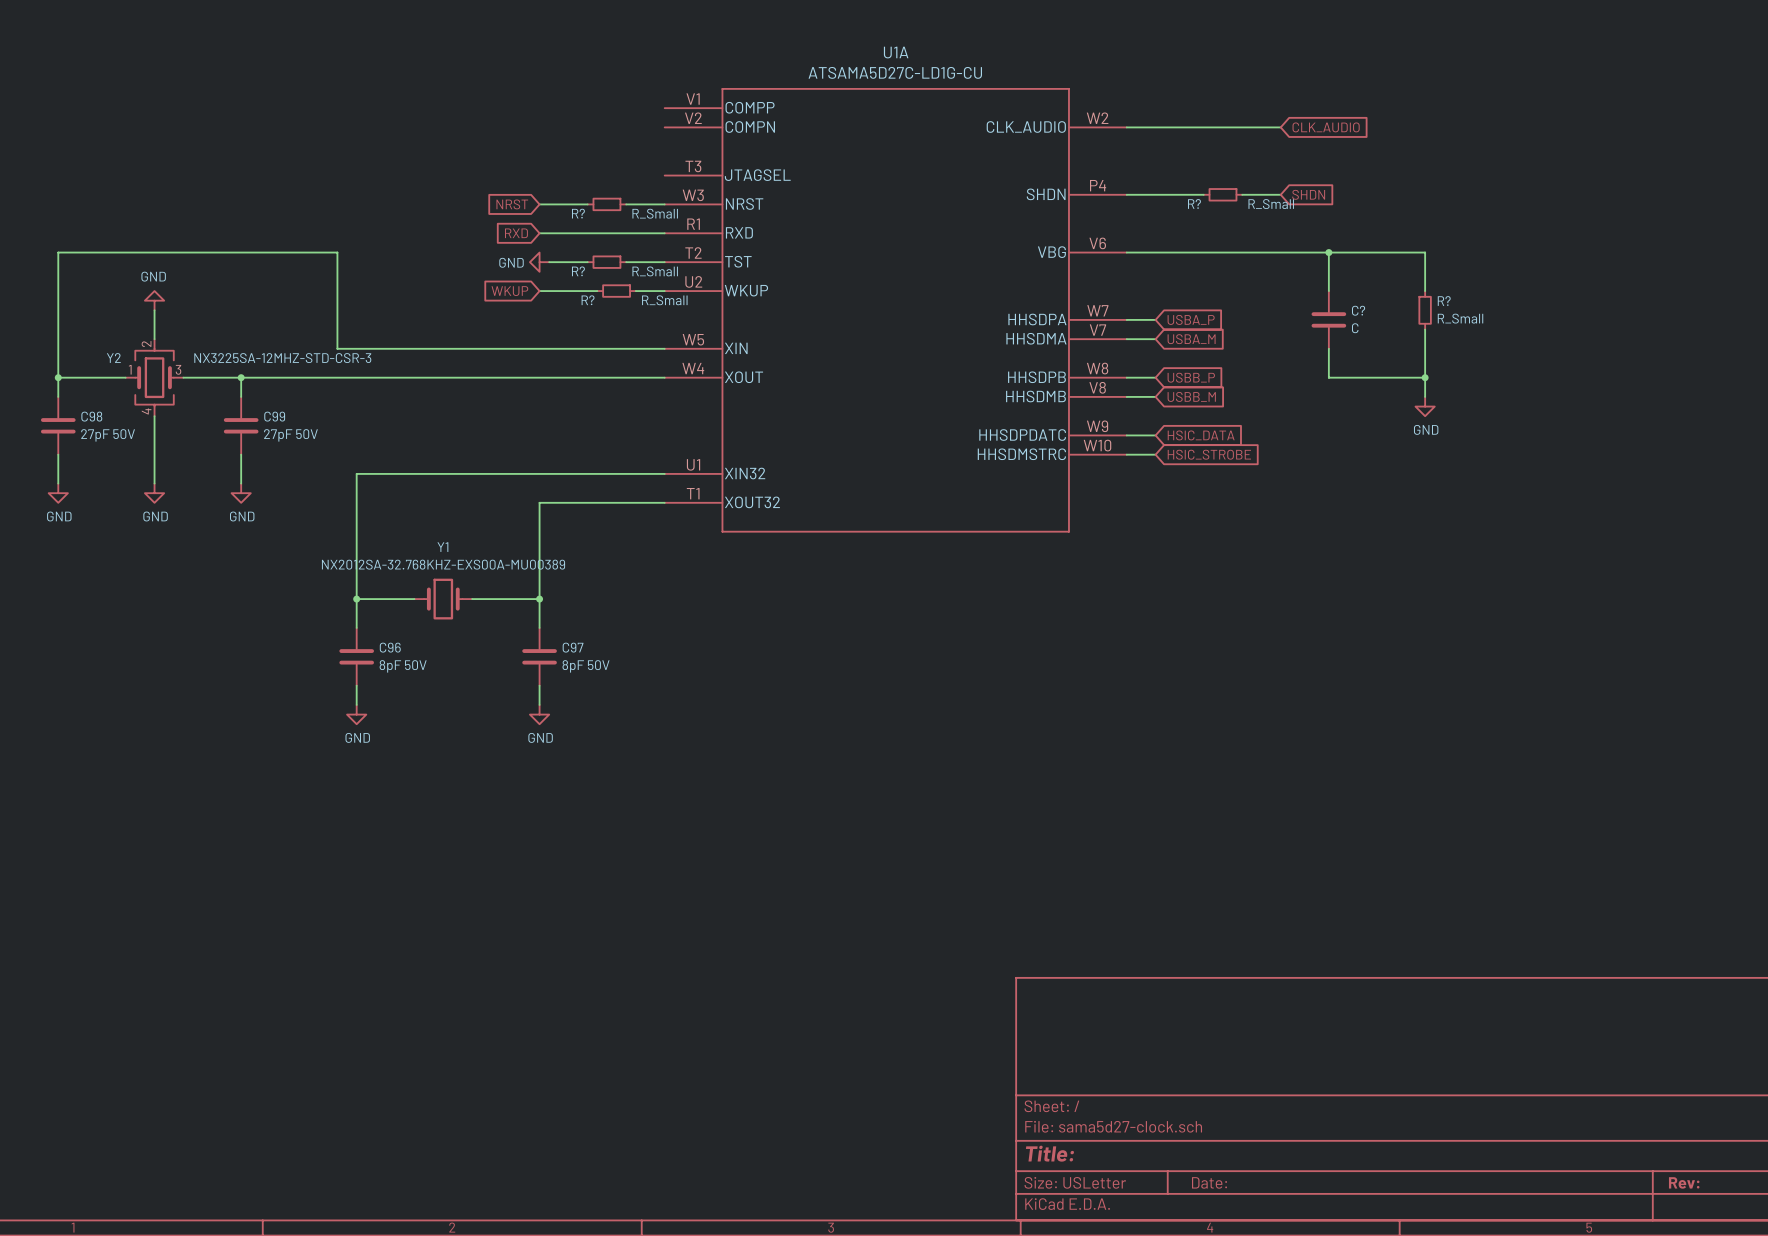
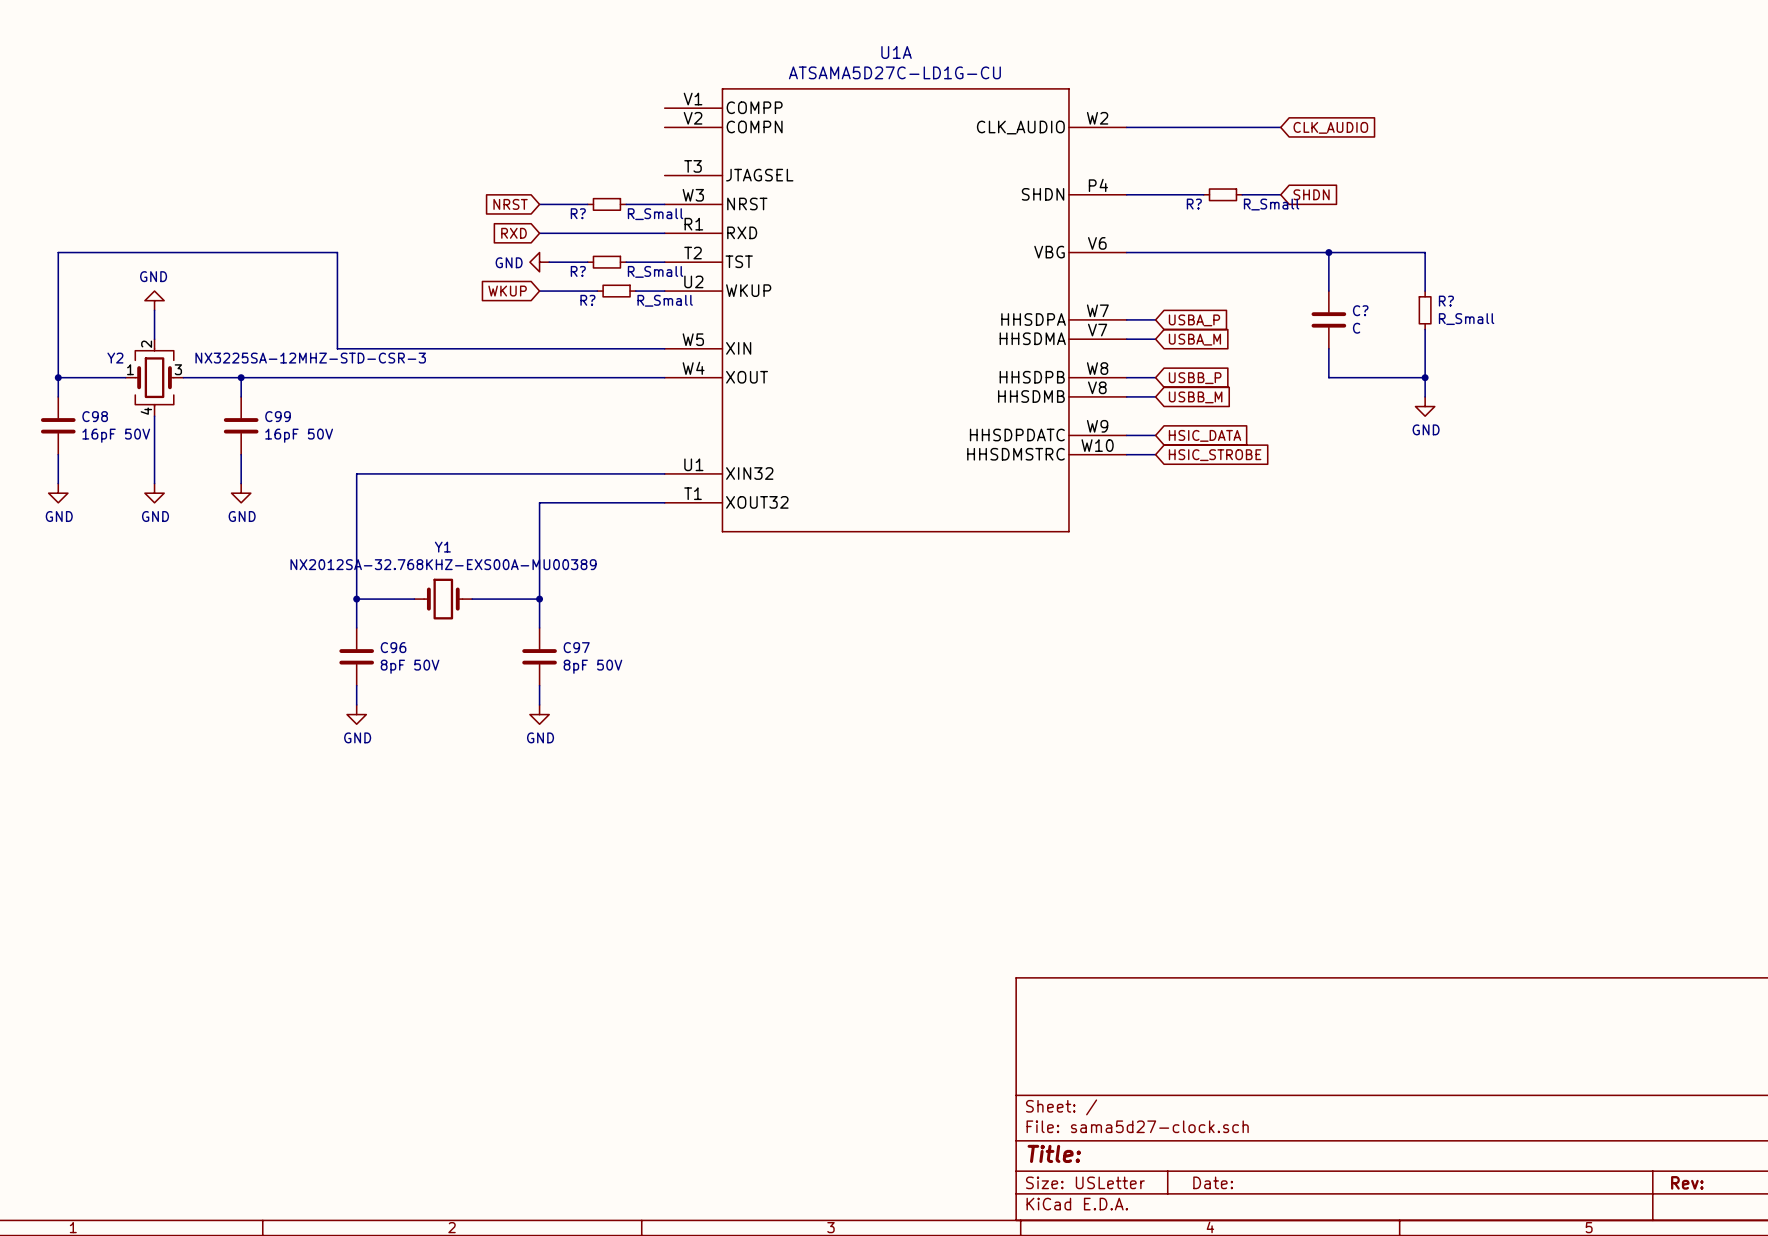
C98 value: 27pF 50V (108, 435) -> 16pF 50V (116, 435)
C99 value: 27pF 50V (290, 435) -> 16pF 50V (299, 435)

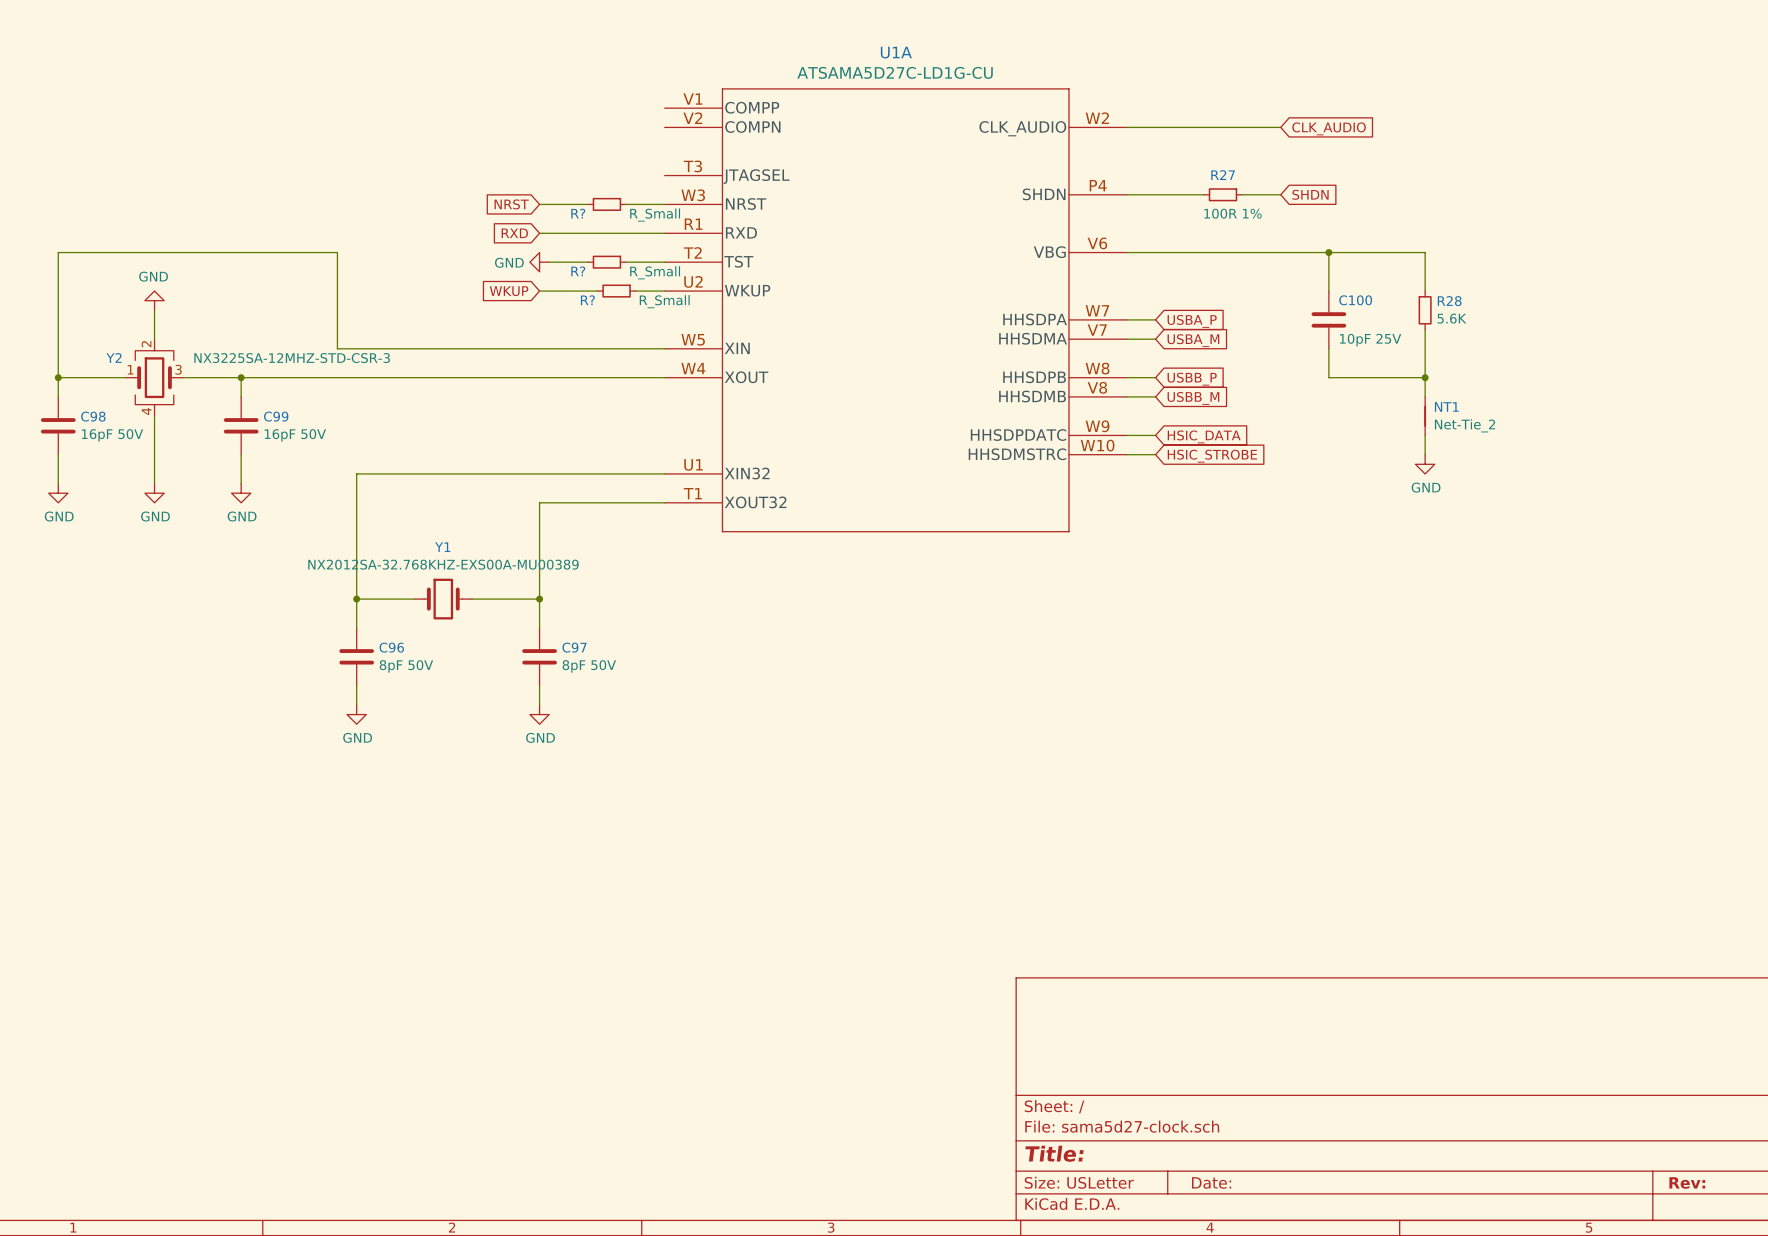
R? name: R? (1194, 204) -> R27 (1223, 175)
R? value: R_Small (1271, 204) -> 100R 1% (1232, 213)
R? name: R? (1446, 301) -> R28 (1449, 301)
C? name: C? (1360, 310) -> C100 (1355, 300)
R? value: R_Small (1466, 319) -> 5.6K (1451, 318)
C? value: C (1356, 328) -> 10pF 25V (1370, 340)
power symbol position: GND (1425, 406) -> GND (1425, 464)
NT1: none -> Net-Tie_2 (1425, 416)
wire: none -> (1425, 435) (1425, 454)

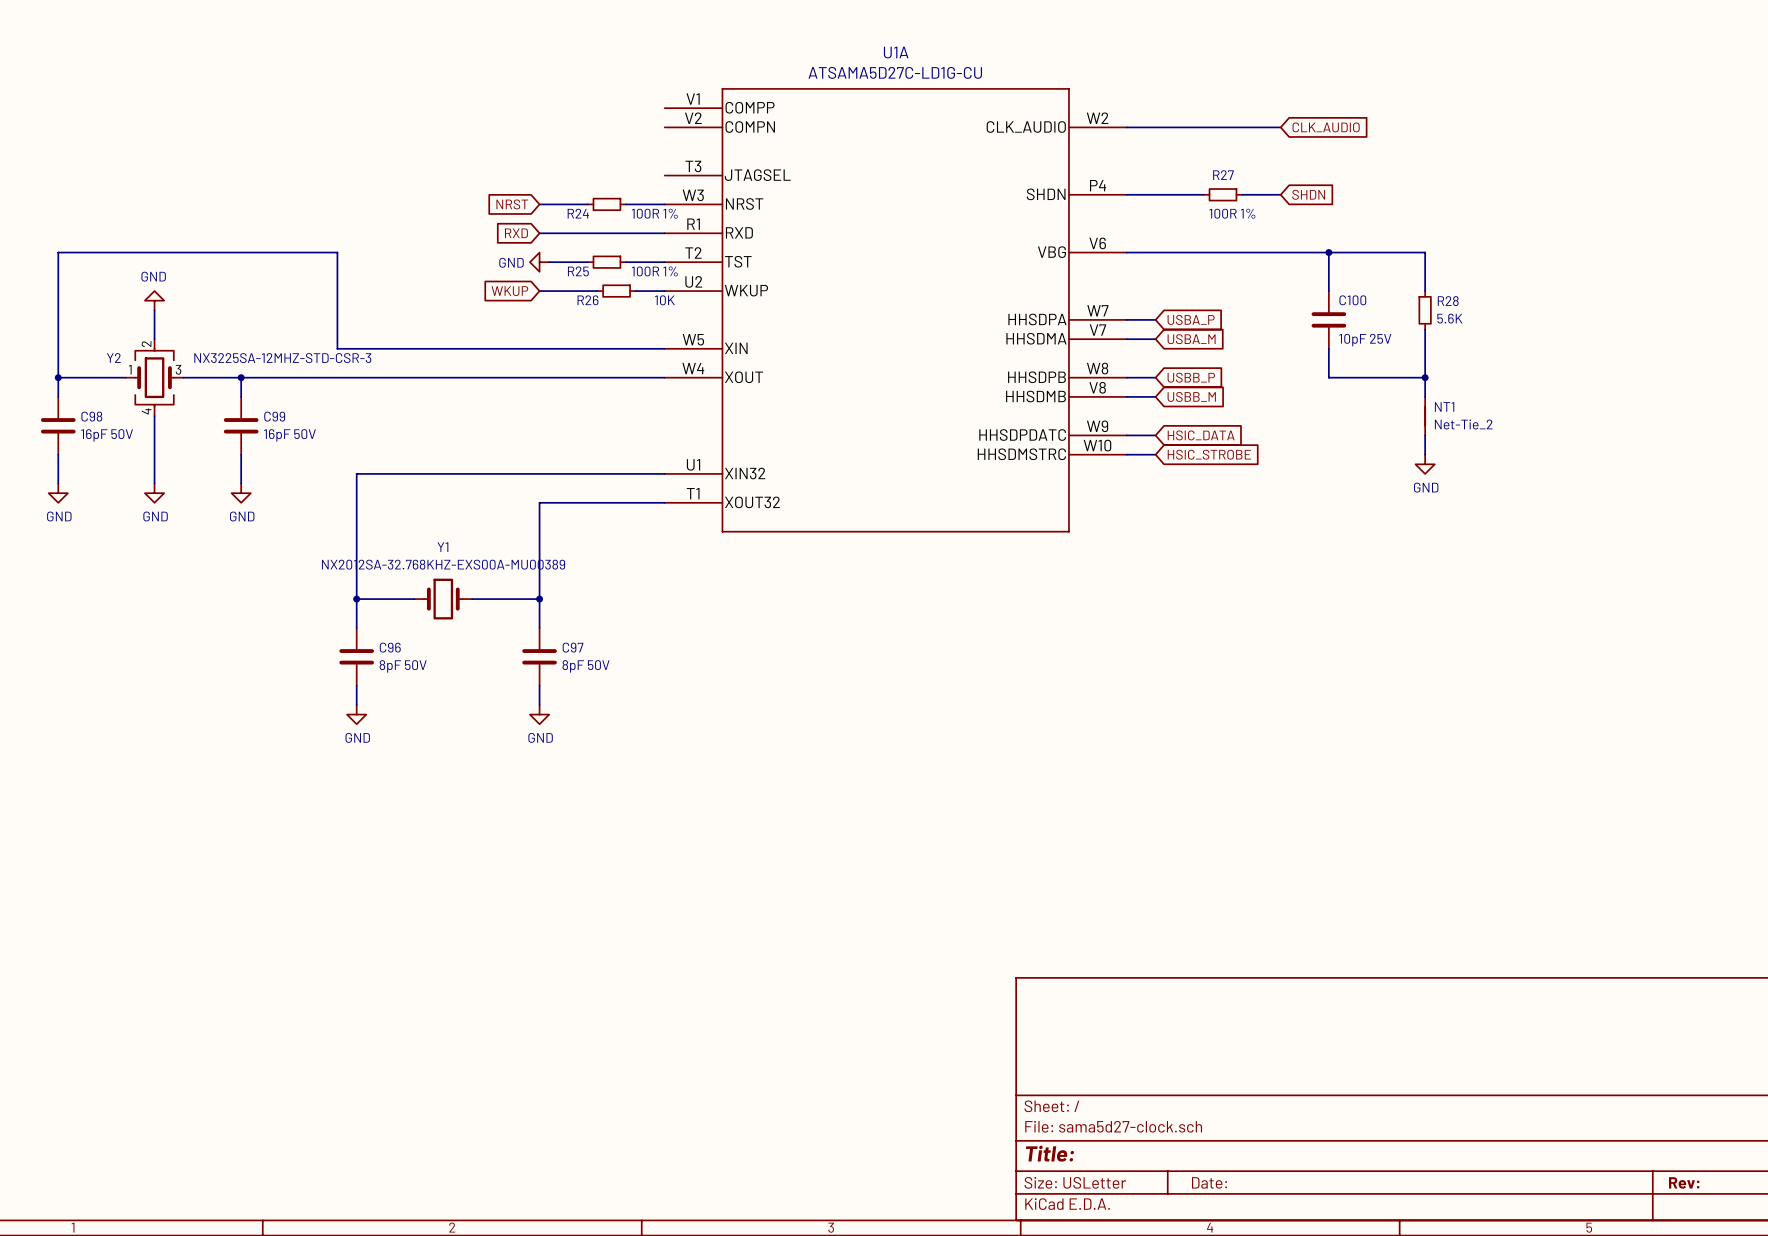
R? name: R? (578, 213) -> R24 (578, 213)
R? value: R_Small (655, 215) -> 100R 1% (654, 213)
R? name: R? (578, 271) -> R25 (578, 271)
R? value: R_Small (655, 272) -> 100R 1% (654, 271)
R? name: R? (587, 300) -> R26 (588, 300)
R? value: R_Small (664, 301) -> 10K (664, 300)

